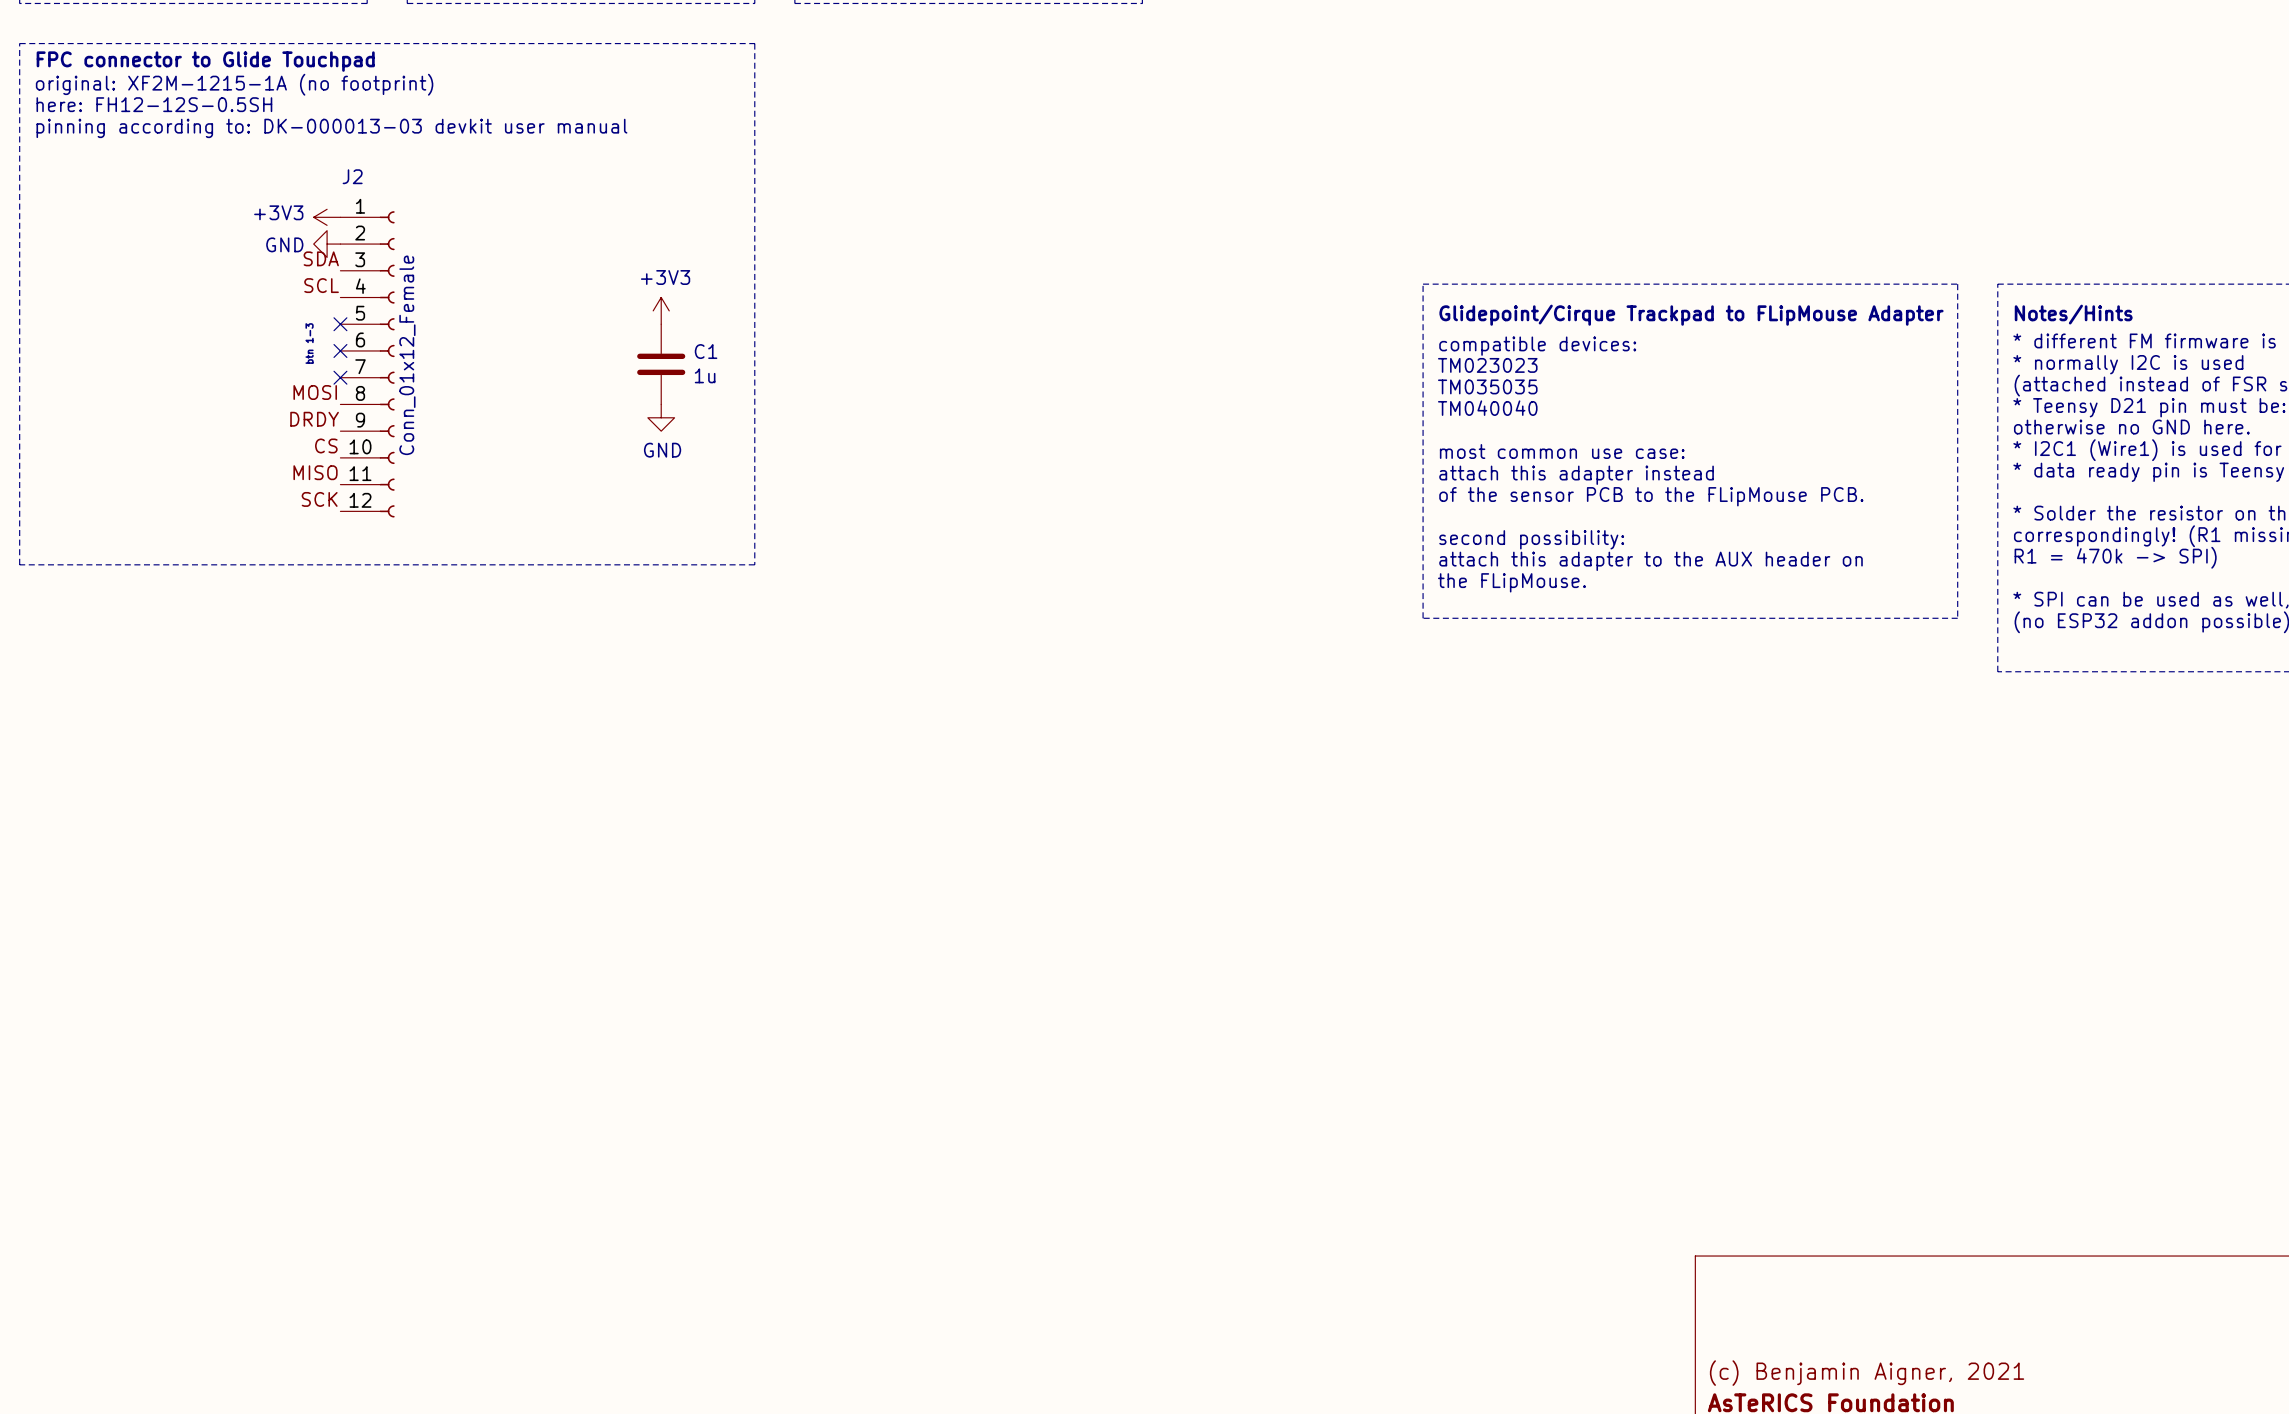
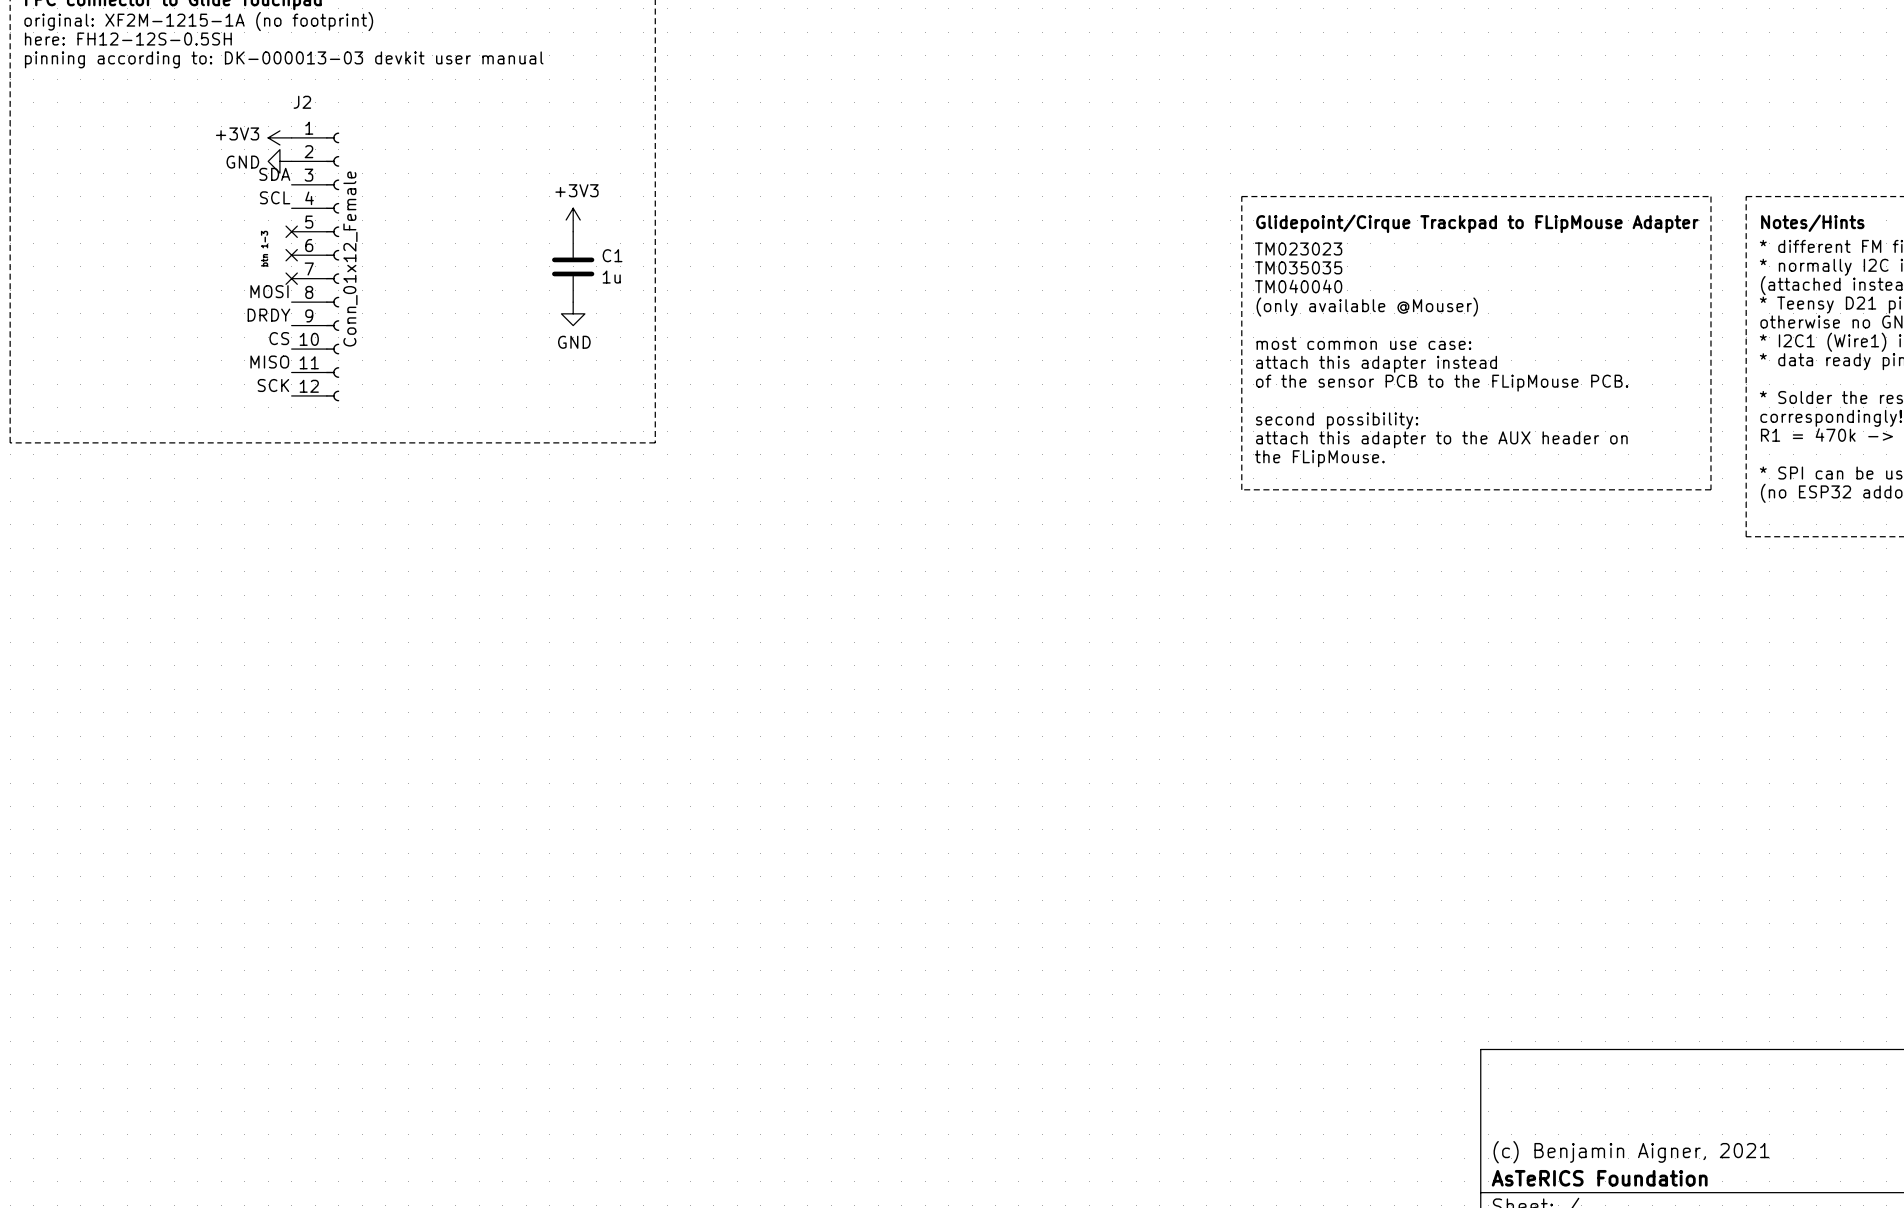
text: compatible devices: (1537, 346) -> TM023023 (1298, 249)
text: TM023023 (1487, 365) -> TM035035 (1298, 267)
text: TM035035 (1487, 386) -> TM040040 (1298, 286)
text: TM040040 (1487, 408) -> (only available @Mouser) (1367, 307)

